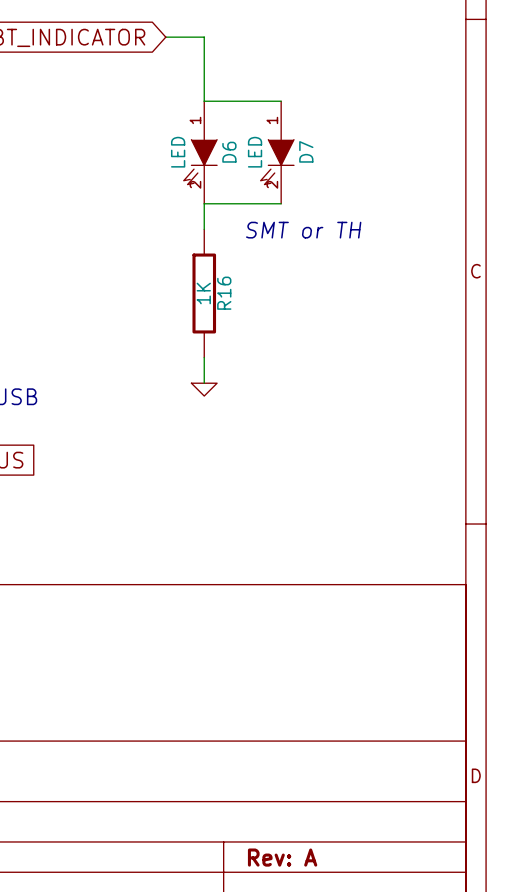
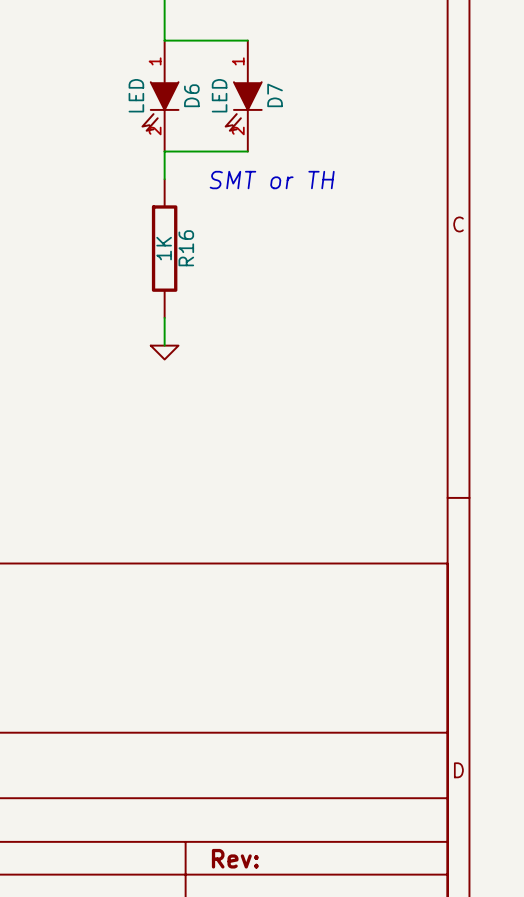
title block: Rev: A (282, 857) -> Rev: (235, 858)

